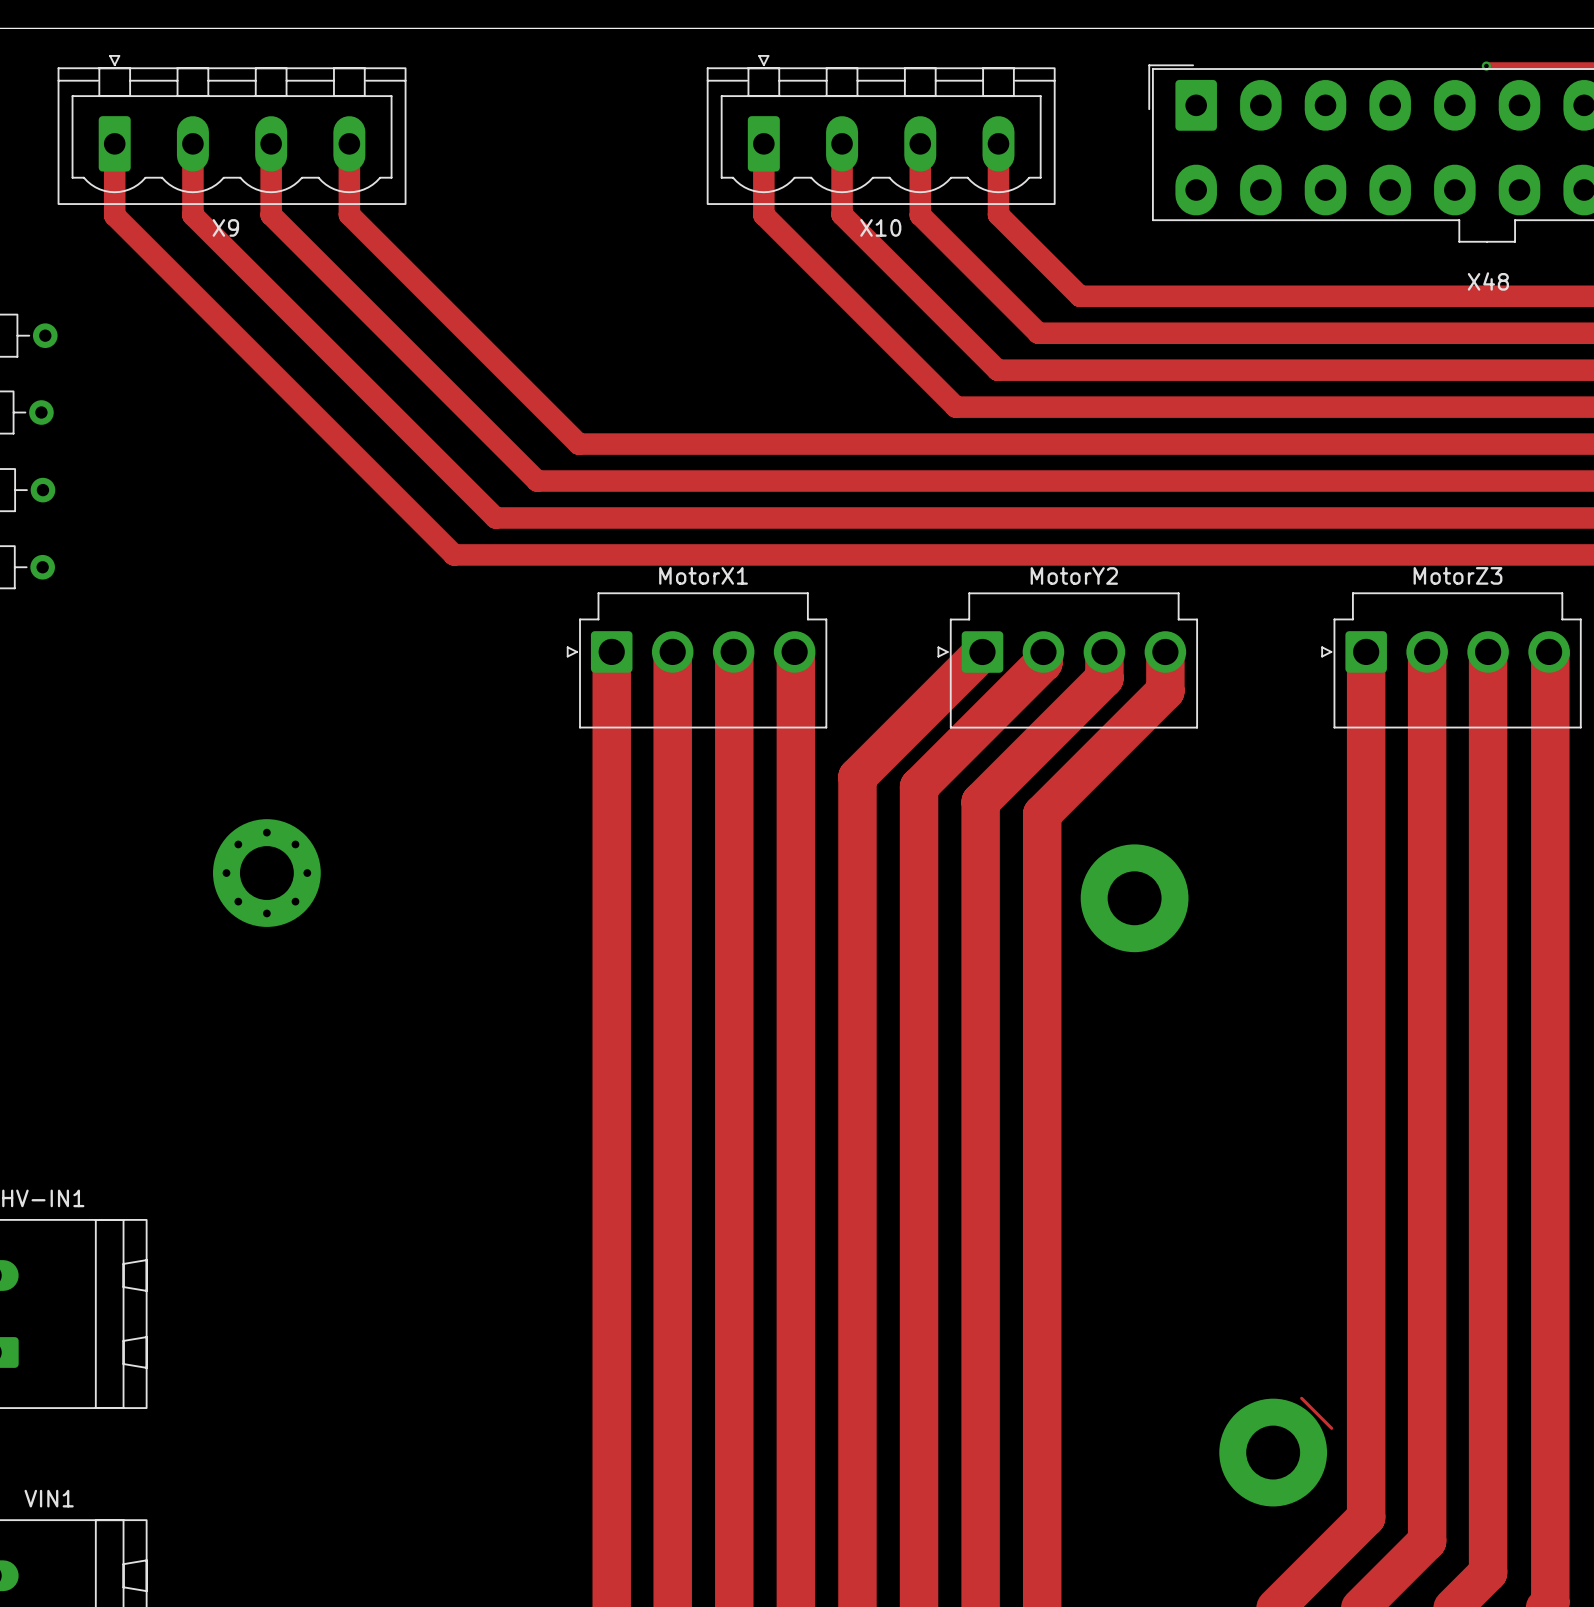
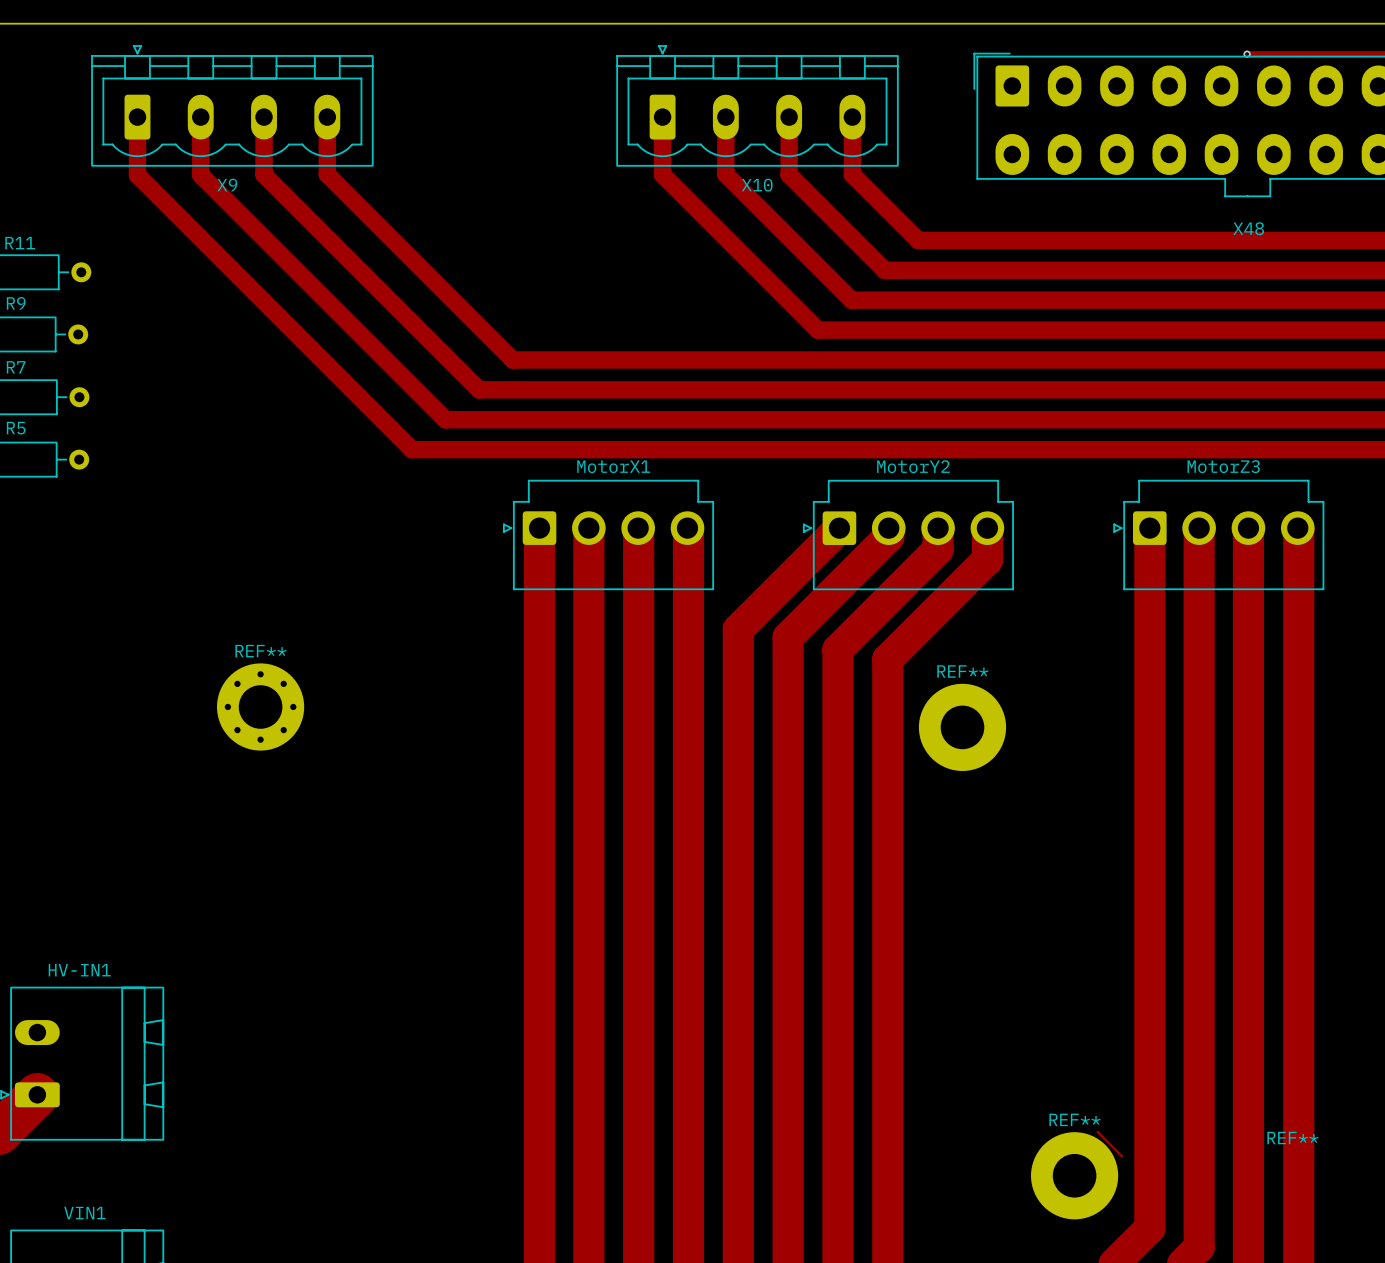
REF** name: none -> REF** (261, 651)
REF** name: none -> REF** (962, 671)
REF** name: none -> REF** (1075, 1119)
REF**: none -> (1292, 1138)

